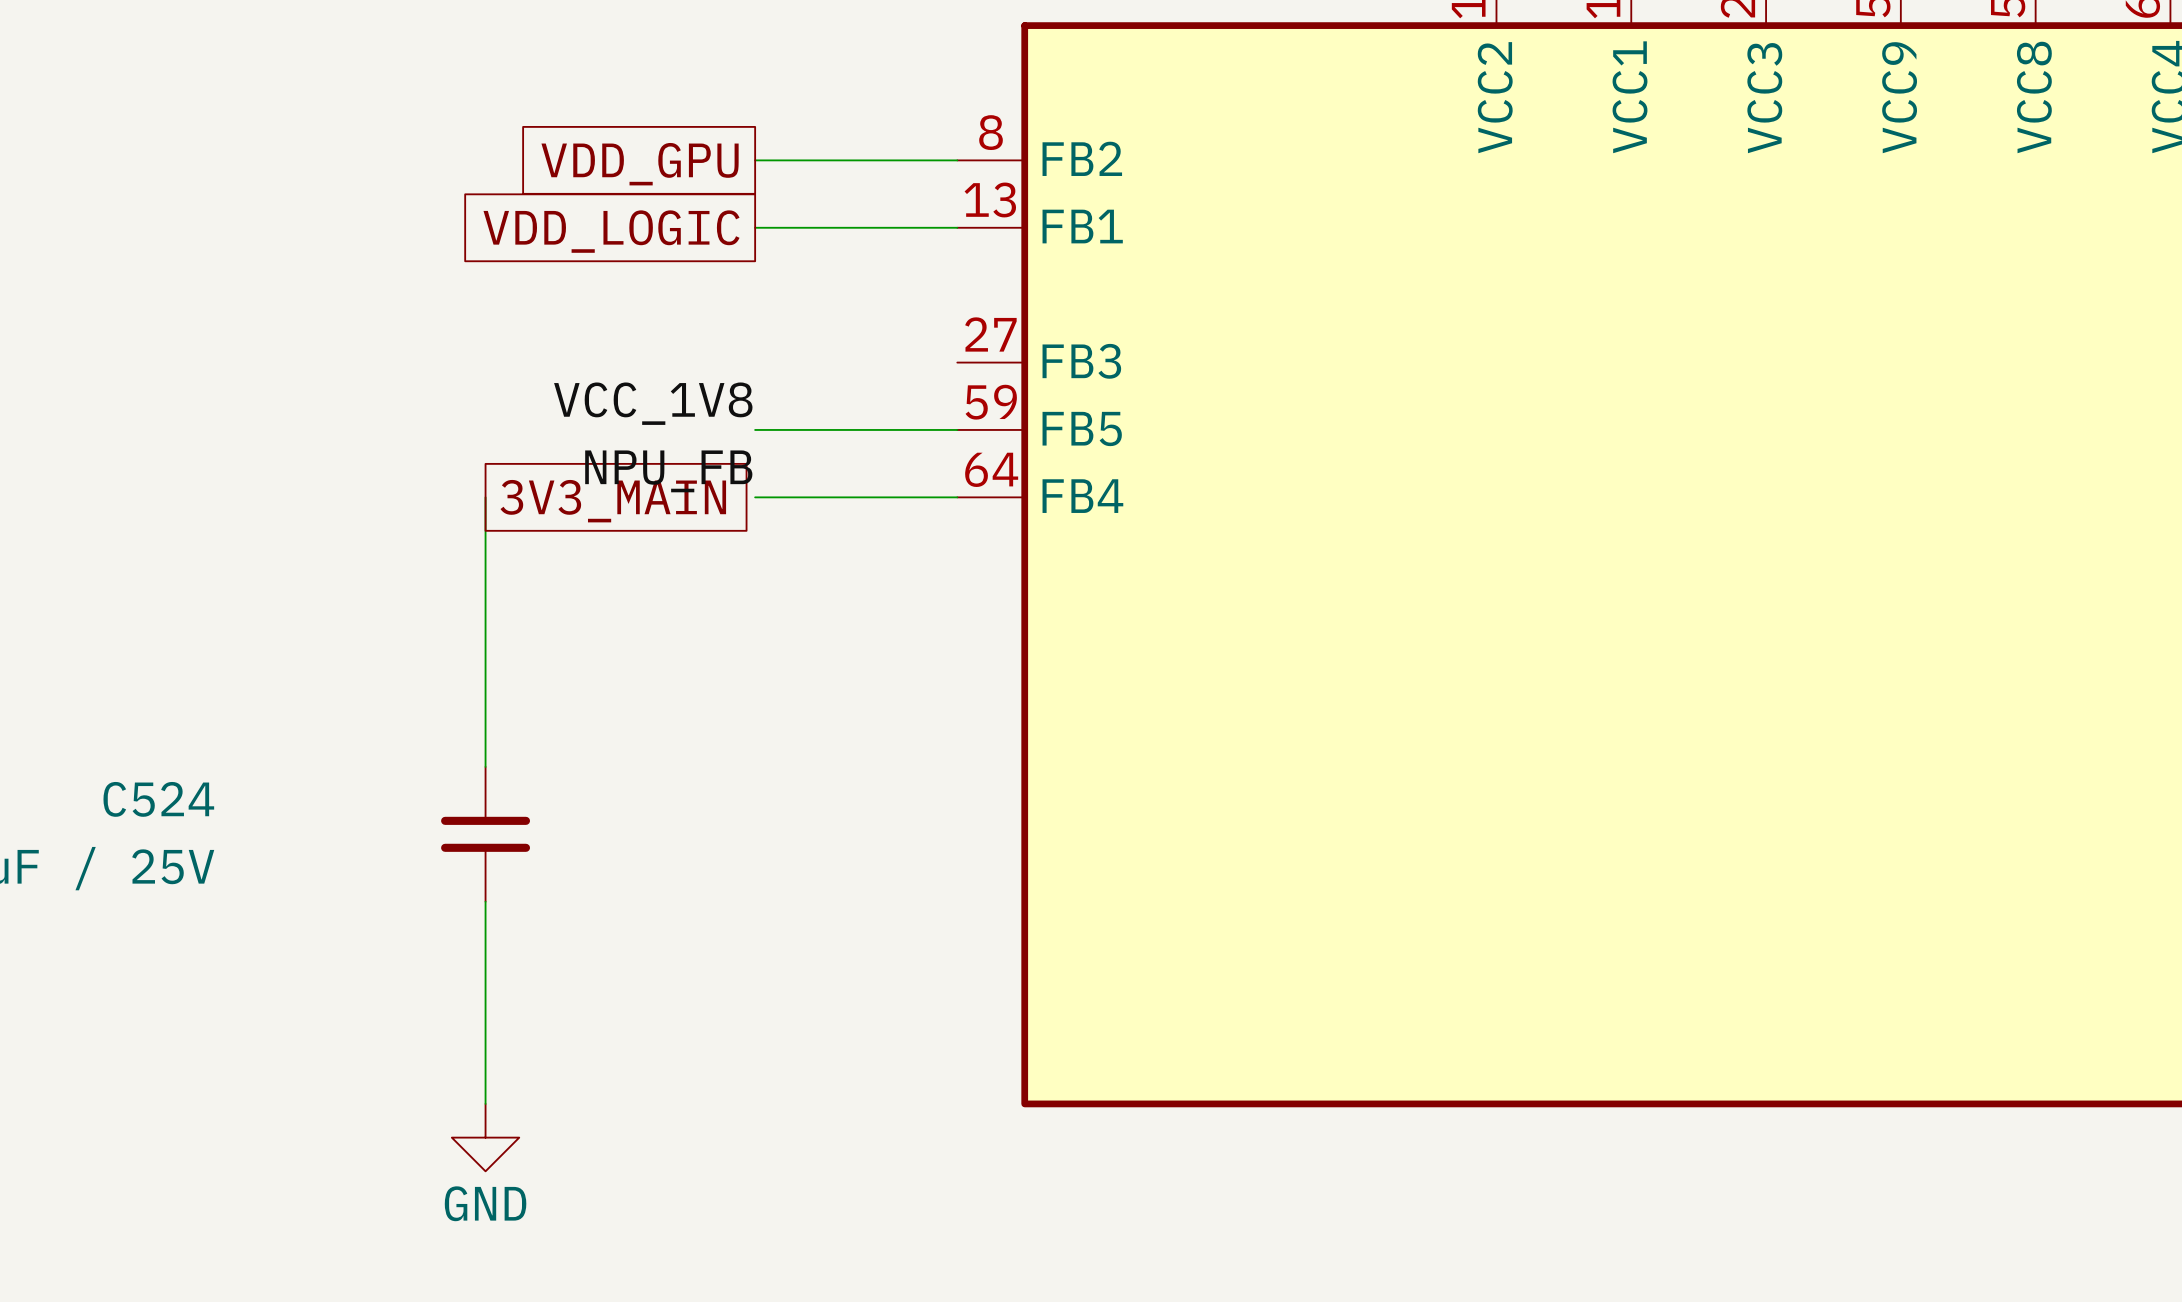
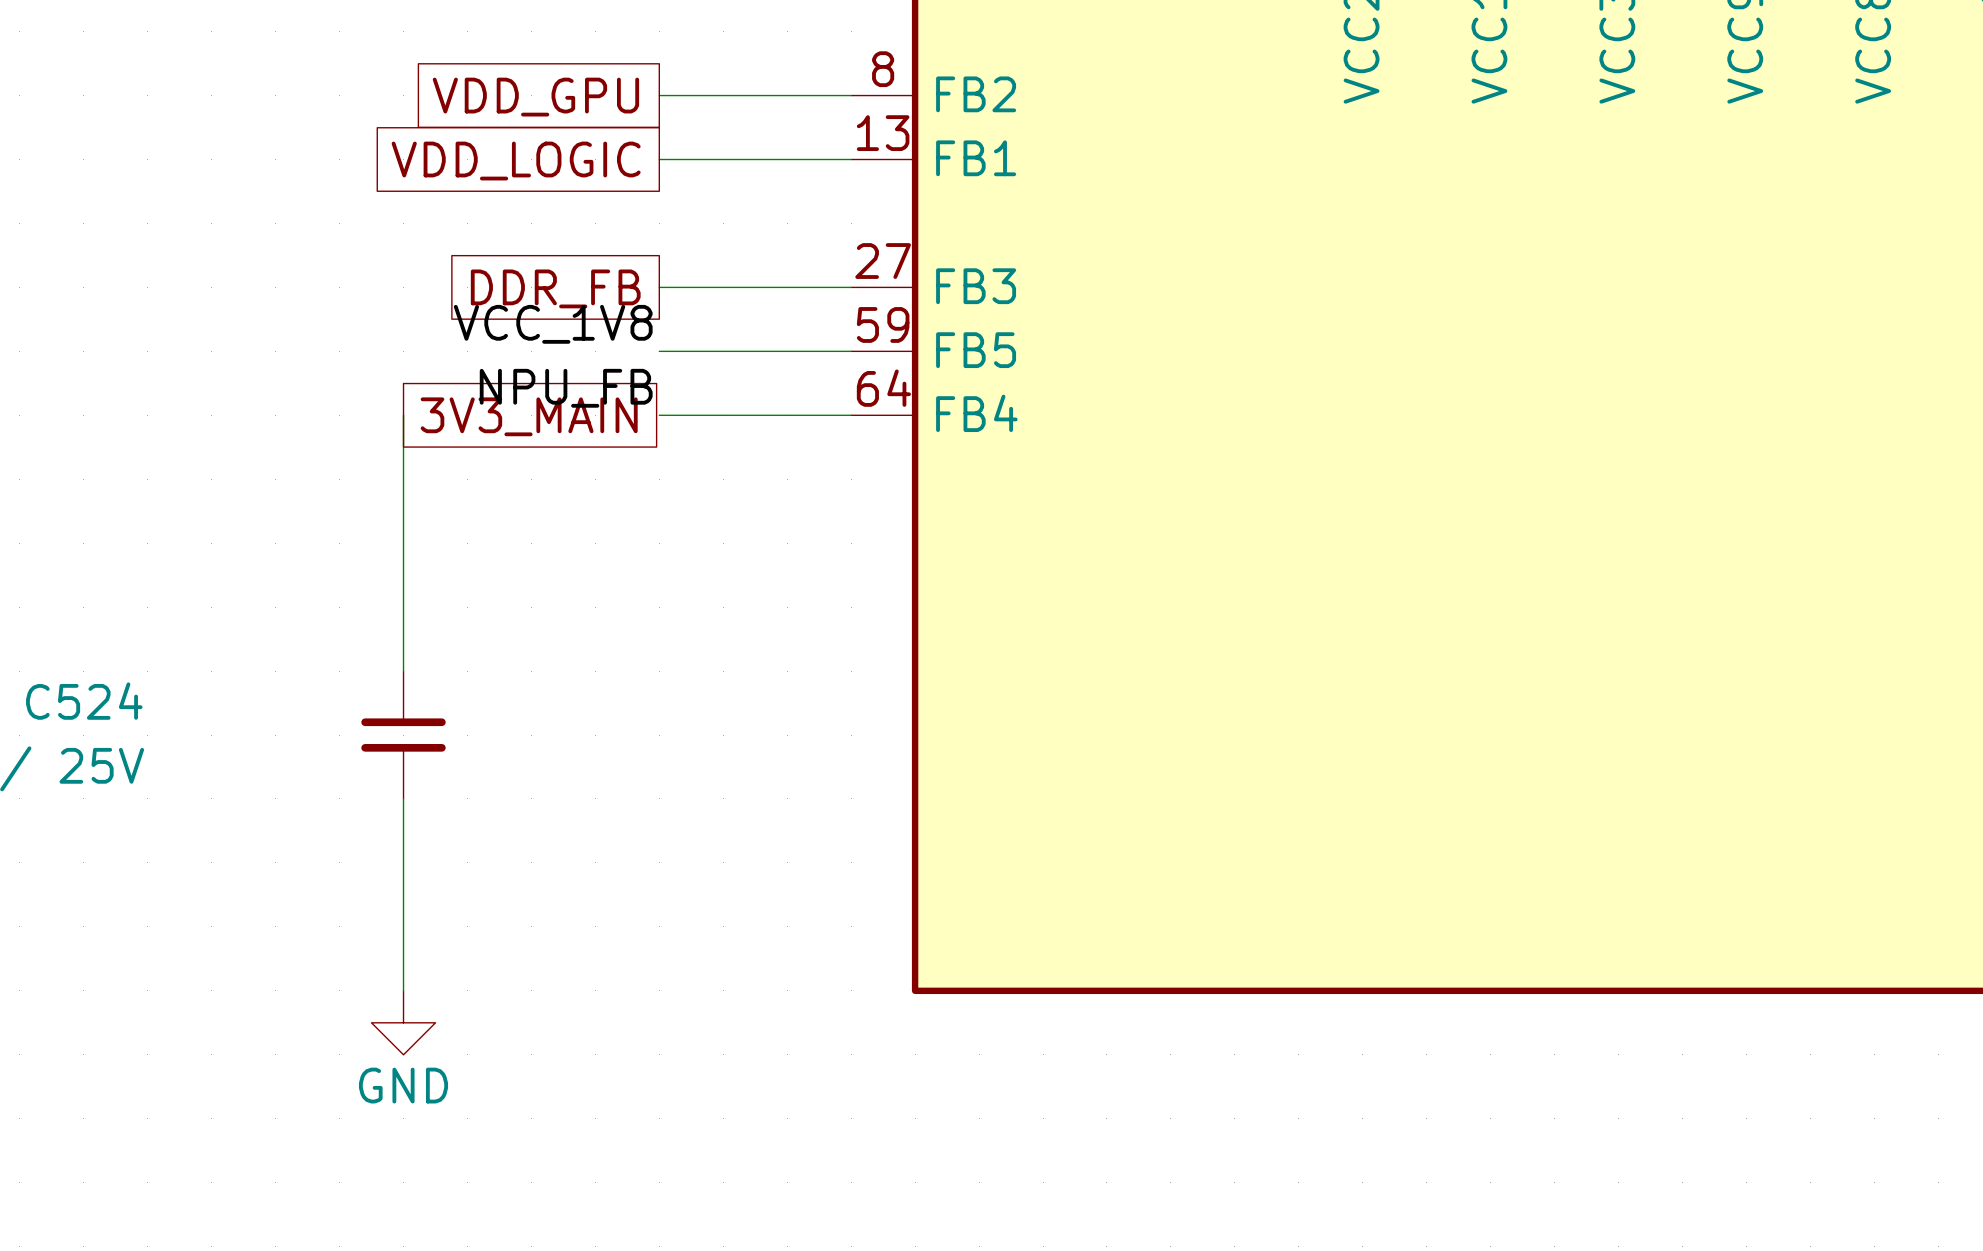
wire: none -> (659, 287) (851, 287)
global label: none -> DDR_FB (555, 288)

